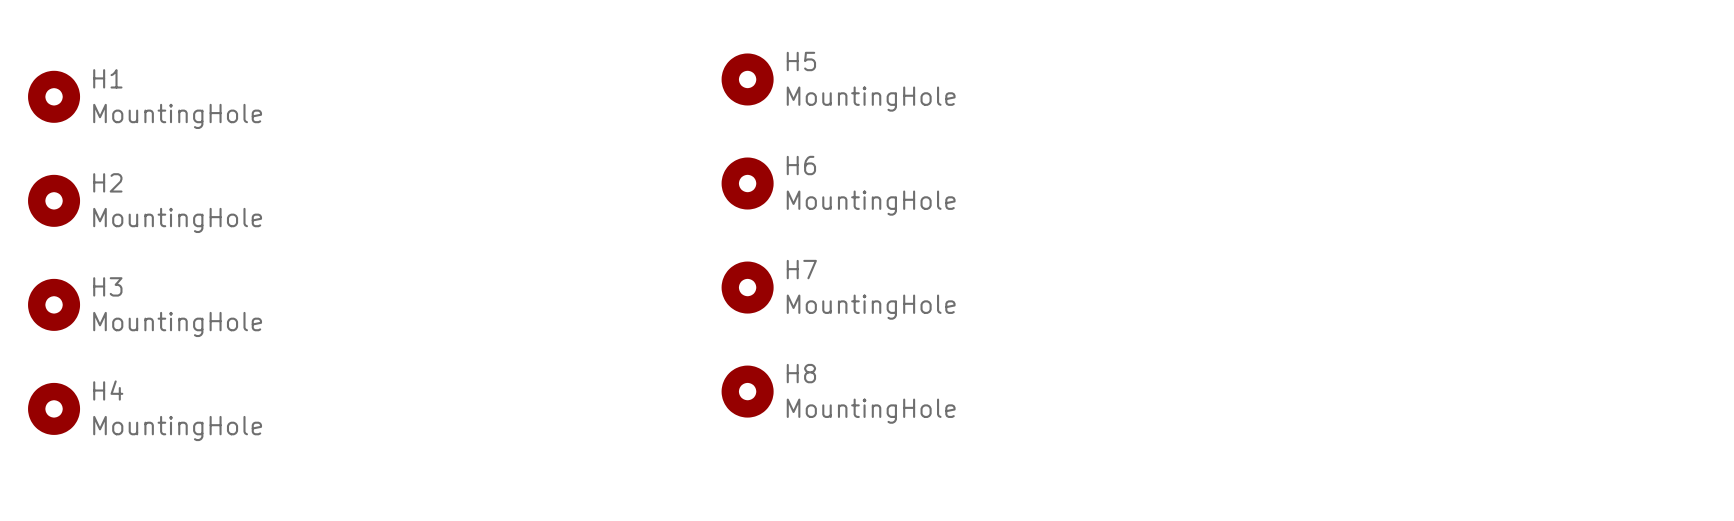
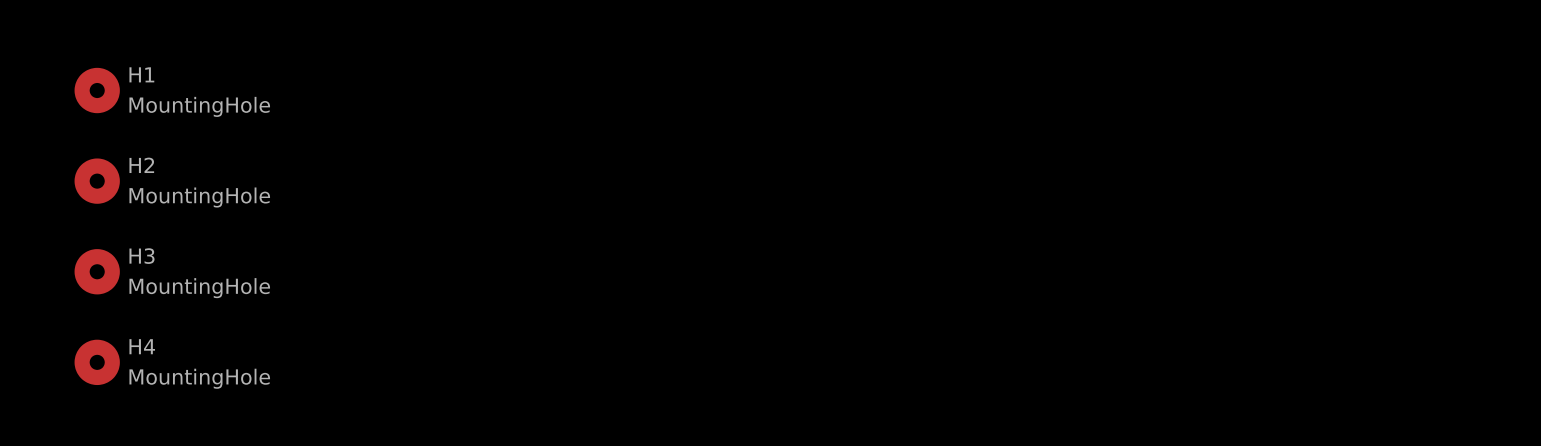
H5: MountingHole (747, 79) -> none
H6: MountingHole (747, 183) -> none
H7: MountingHole (747, 287) -> none
H8: MountingHole (747, 391) -> none

